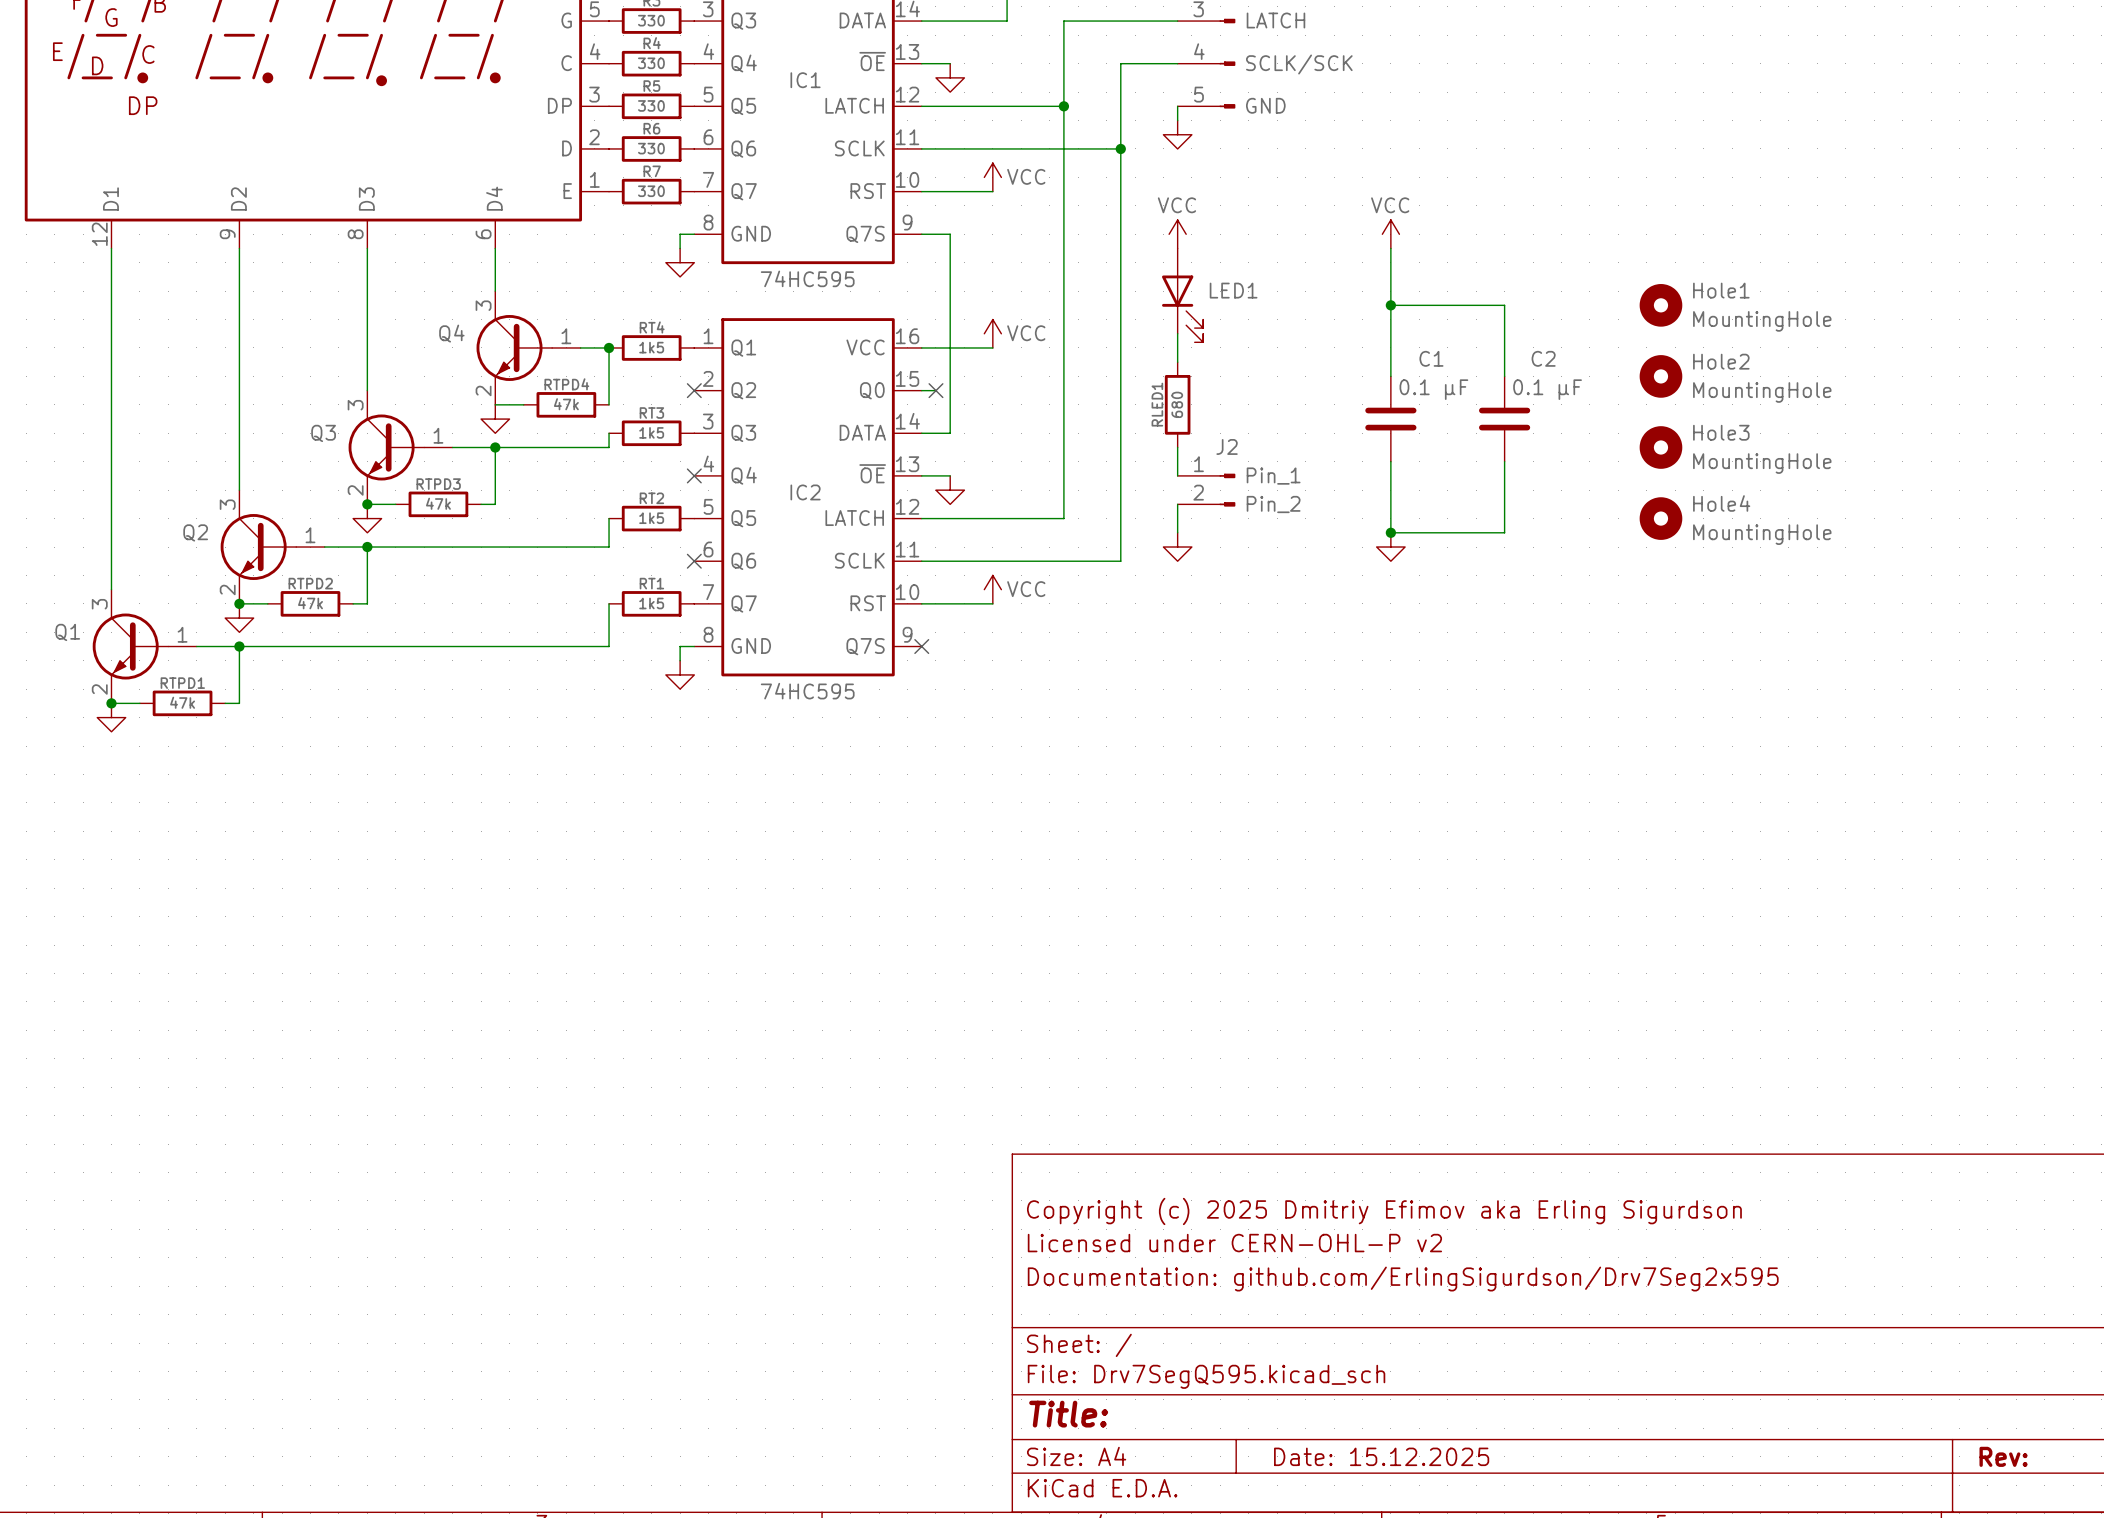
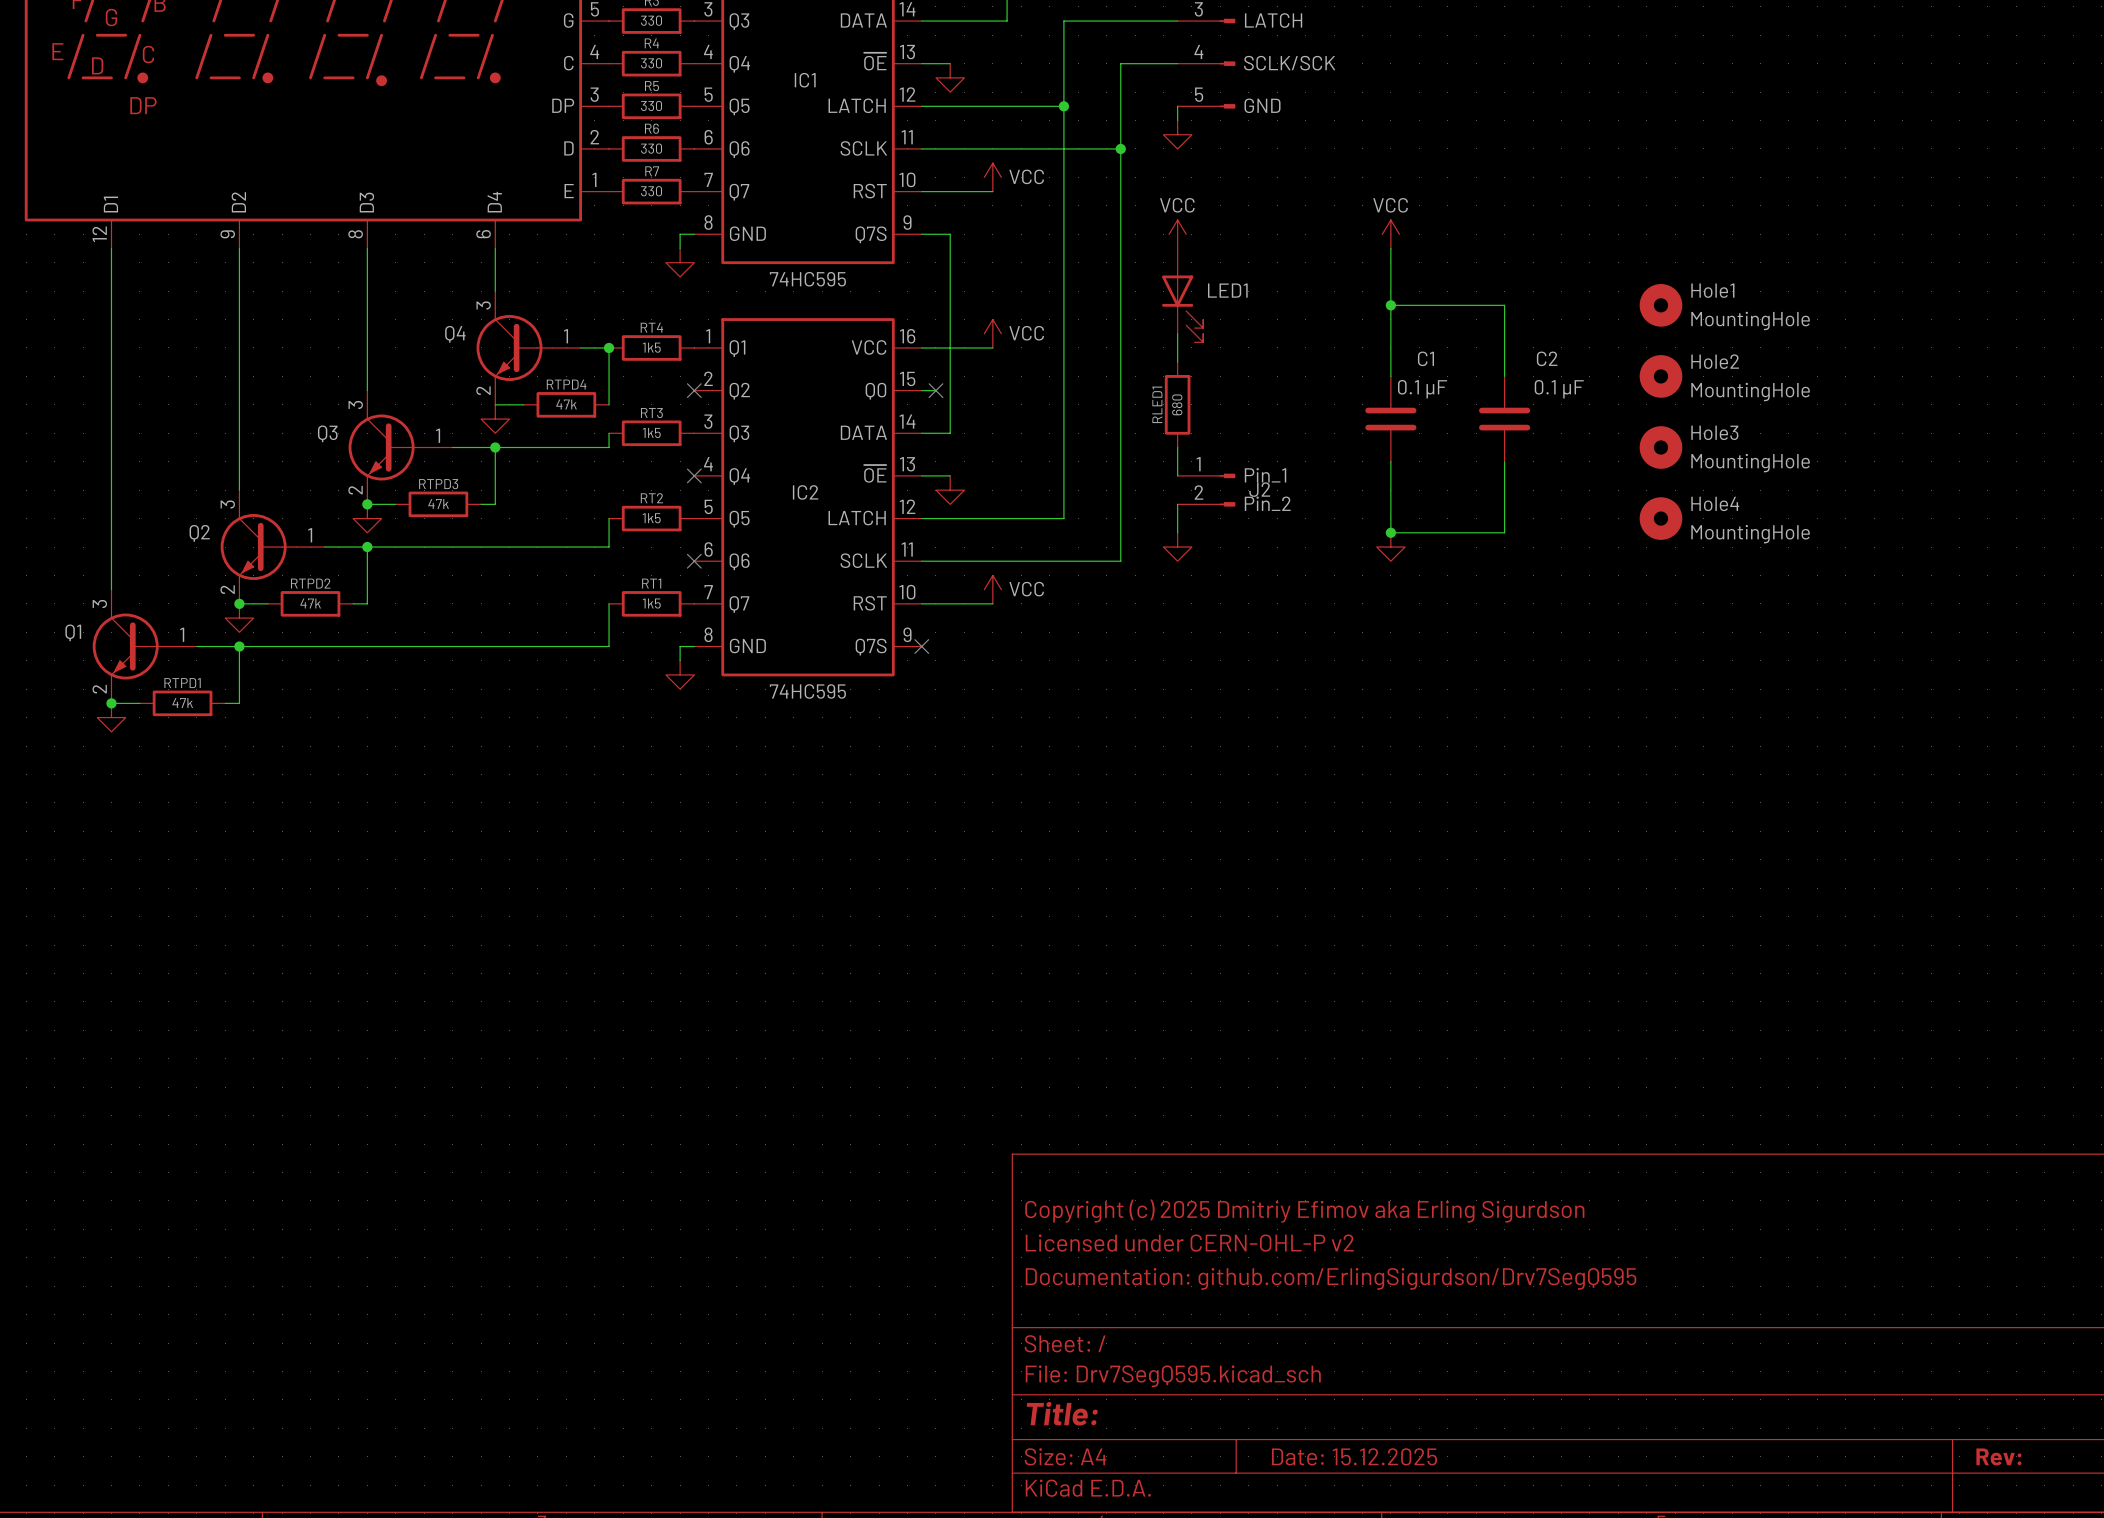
J2 name position: J2 (1227, 446) -> J2 (1259, 489)
title block: Documentation: github.com/ErlingSigurdson/Drv7Seg2x595 (1403, 1279) -> Documentation: github.com/ErlingSigurdson/Drv7SegQ595 (1331, 1278)

